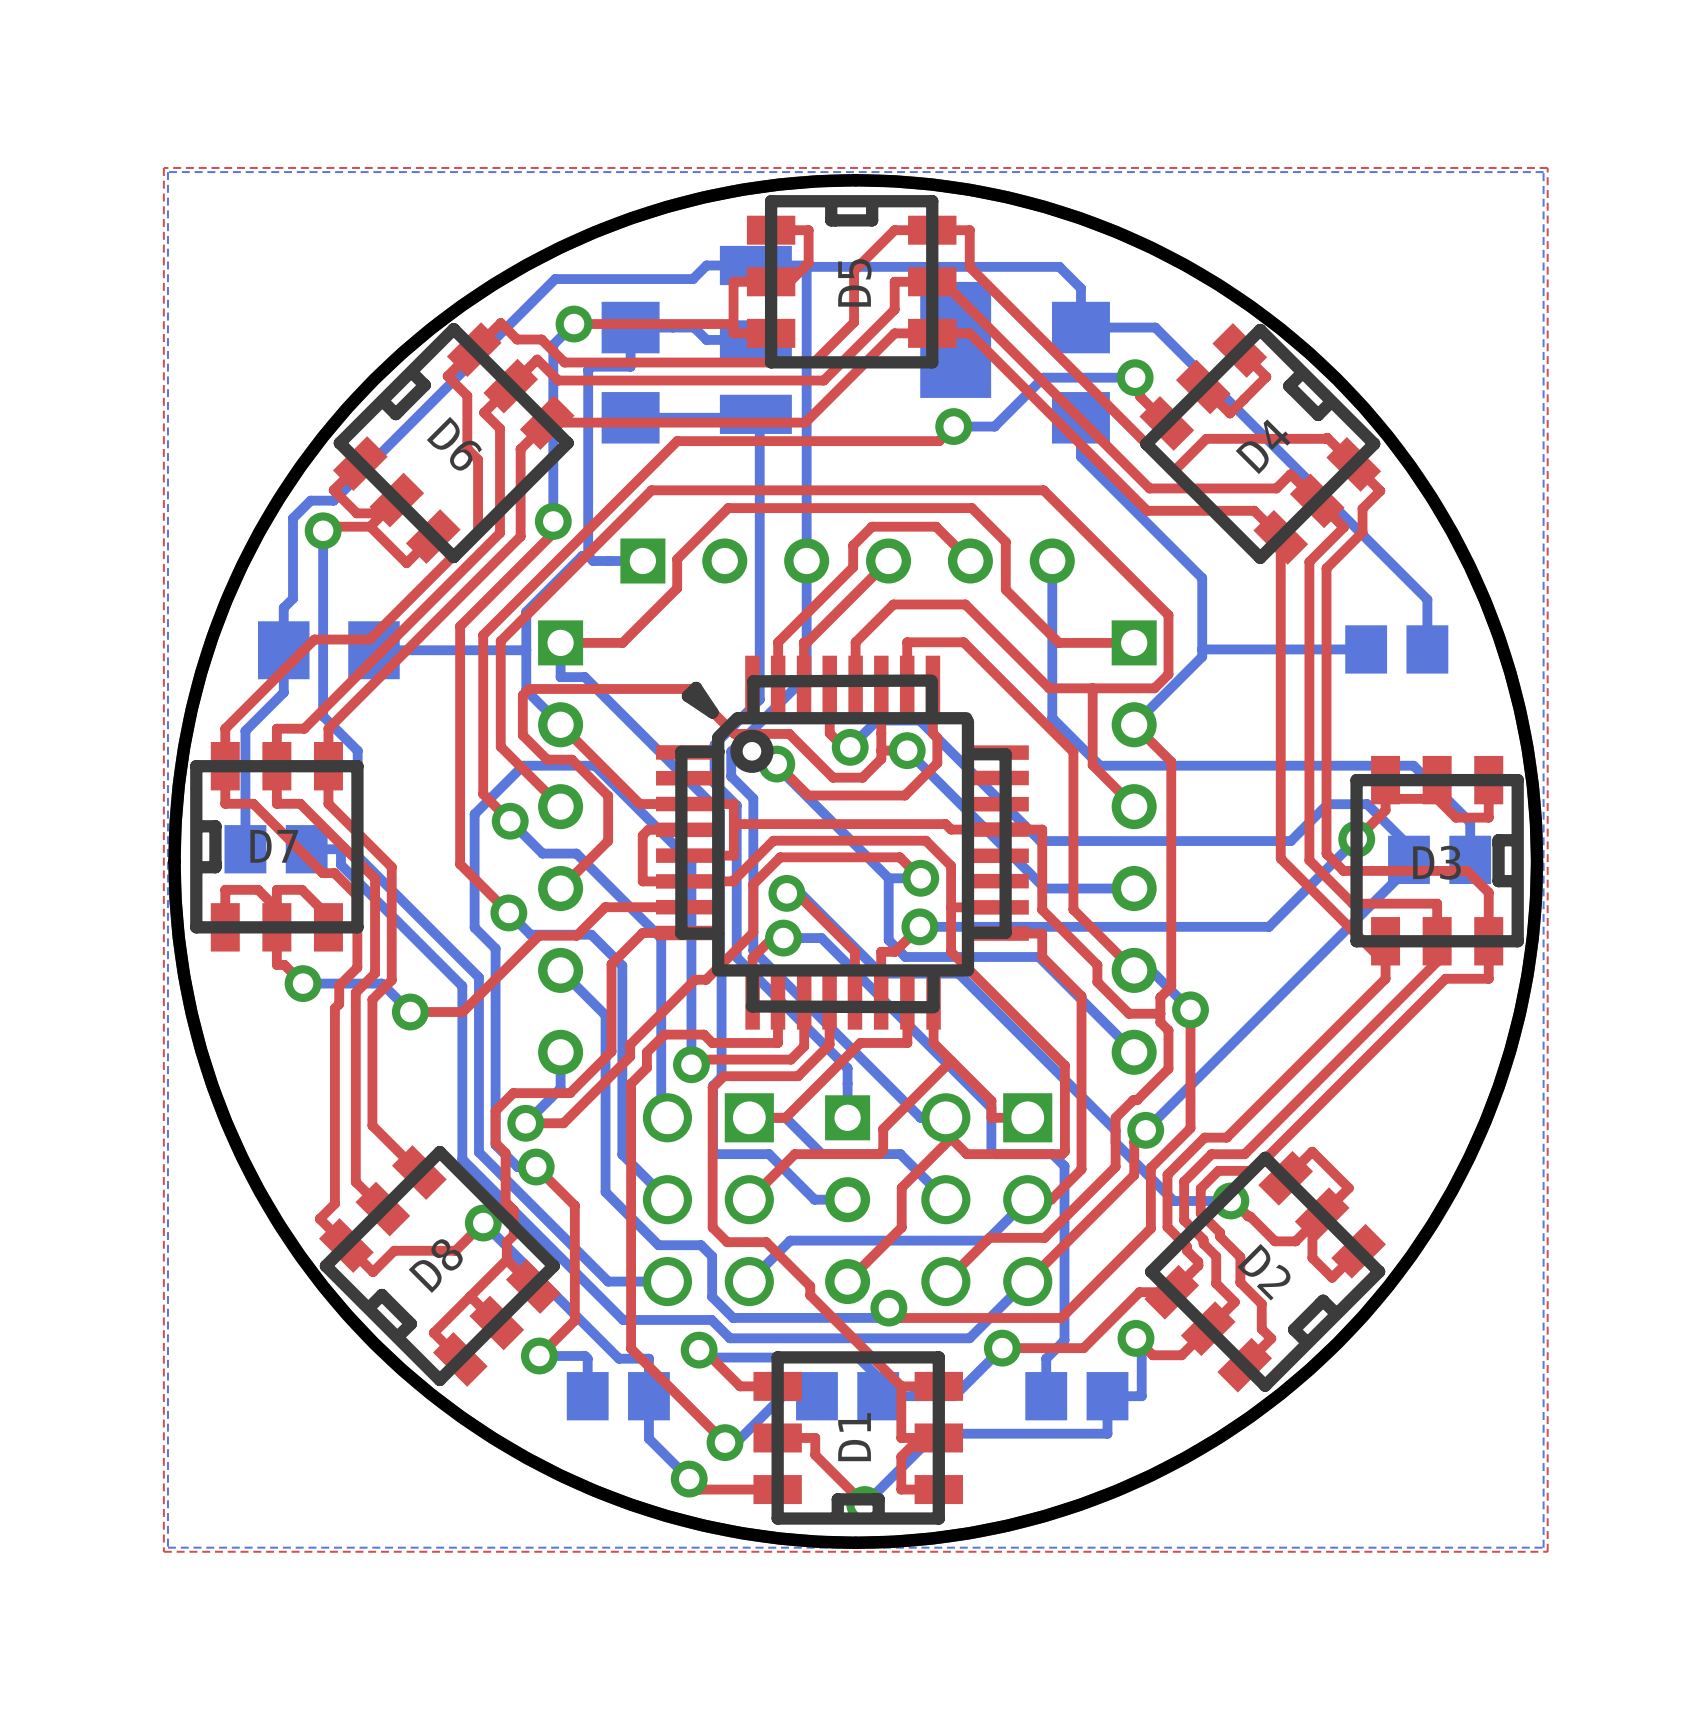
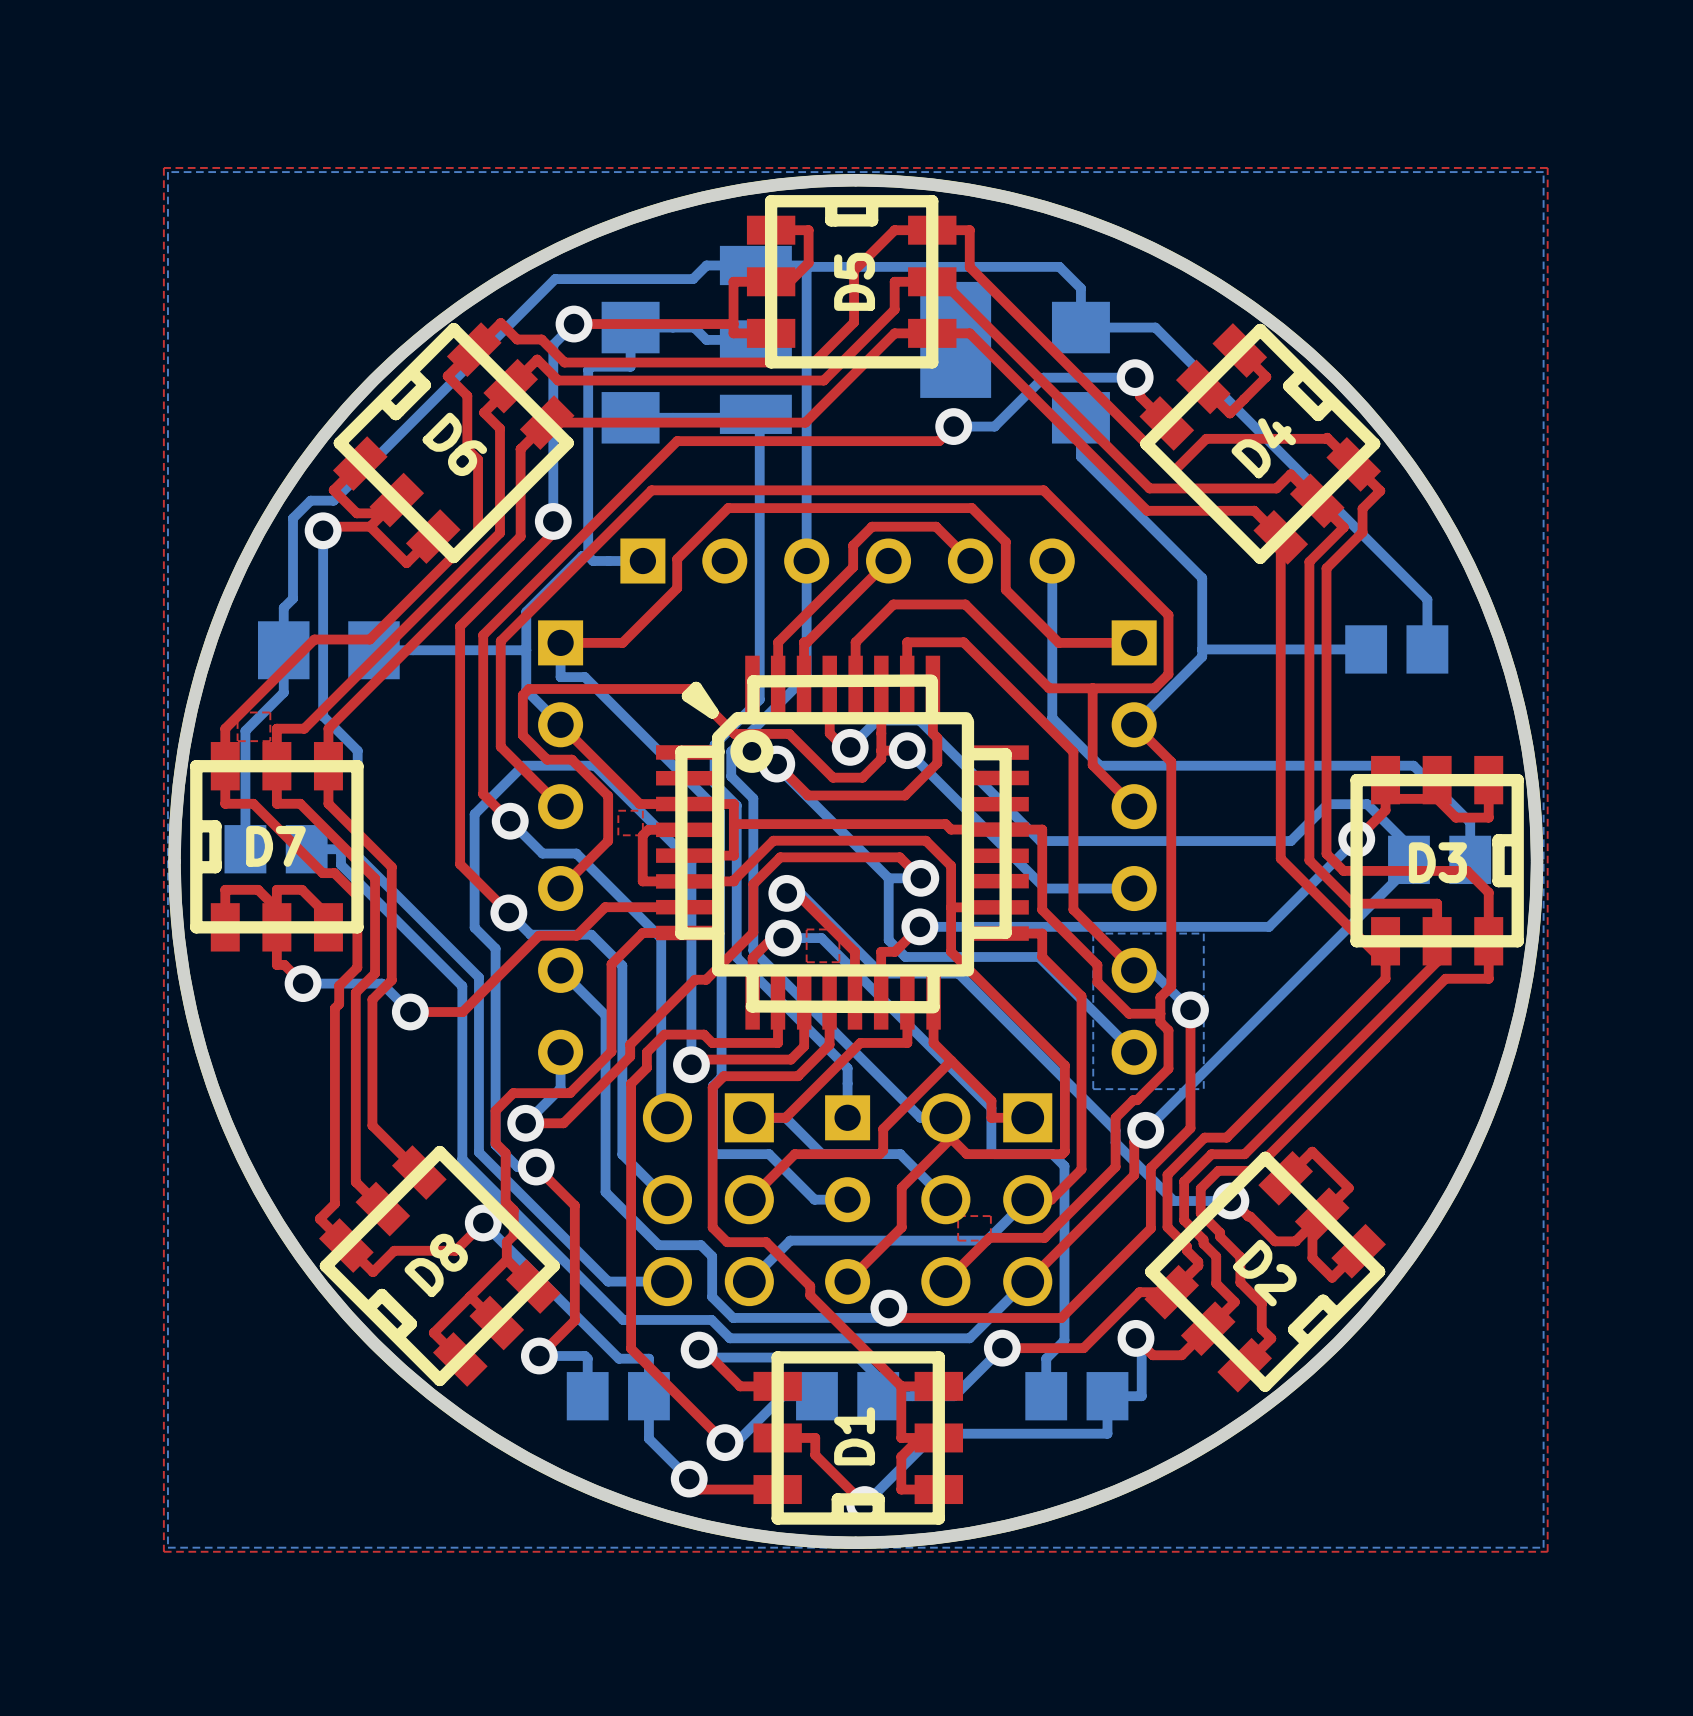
top zone outline: none -> (237, 712) (237, 741) (270, 741) (270, 712) (237, 712)
top zone outline: none -> (618, 810) (618, 835) (642, 835) (642, 810) (618, 810)
top zone outline: none -> (806, 929) (806, 962) (839, 962) (839, 929) (806, 929)
bottom zone outline: none -> (1093, 933) (1203, 933) (1203, 1089) (1093, 1089) (1093, 933)
top zone outline: none -> (958, 1216) (958, 1240) (990, 1240) (990, 1216) (958, 1216)

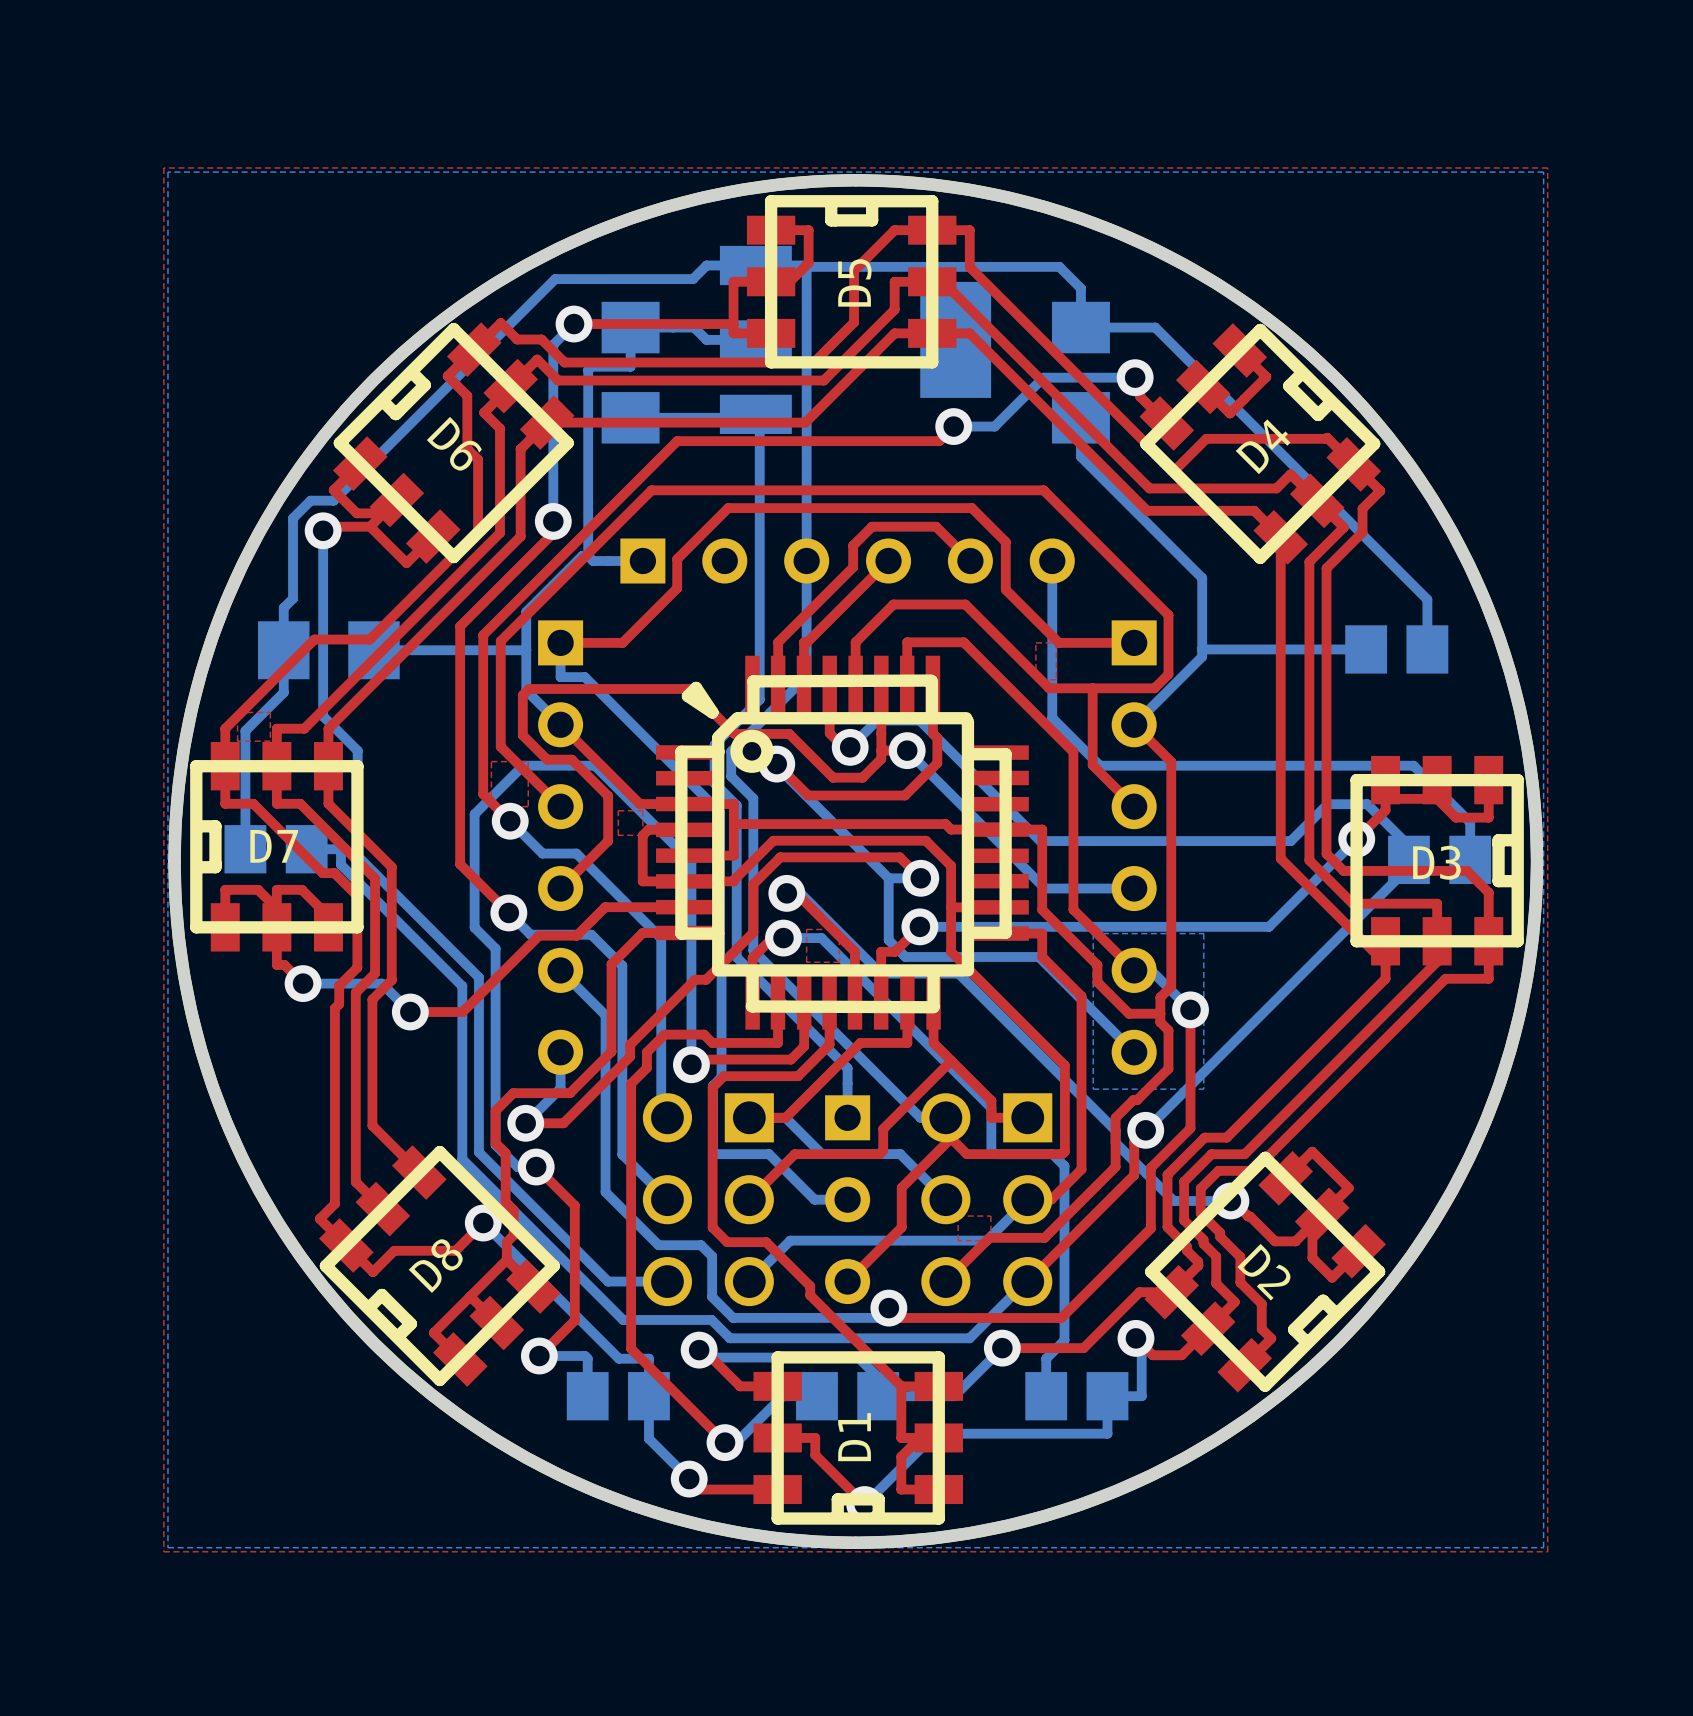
top zone outline: none -> (1035, 642) (1035, 679) (1056, 679) (1056, 642) (1035, 642)
top zone outline: none -> (491, 761) (491, 806) (528, 806) (528, 761) (491, 761)

